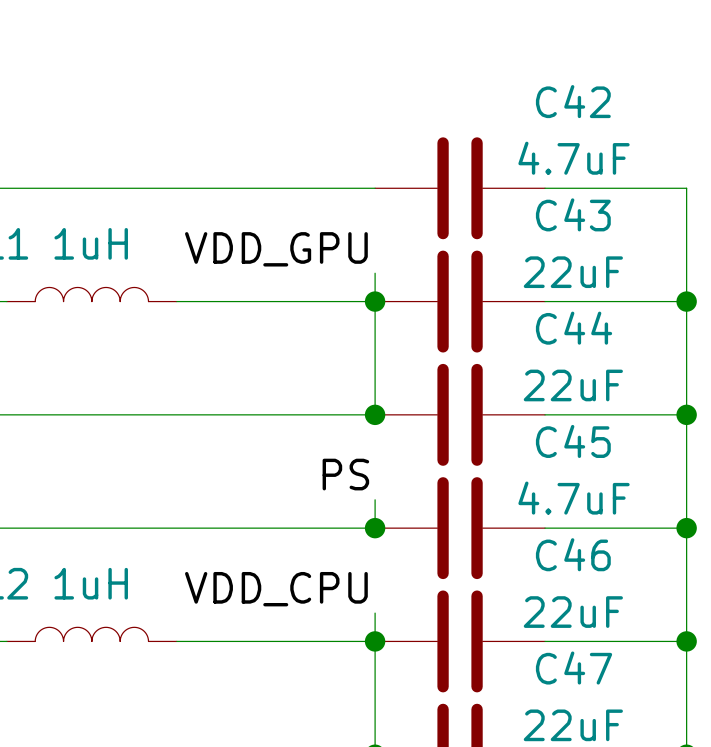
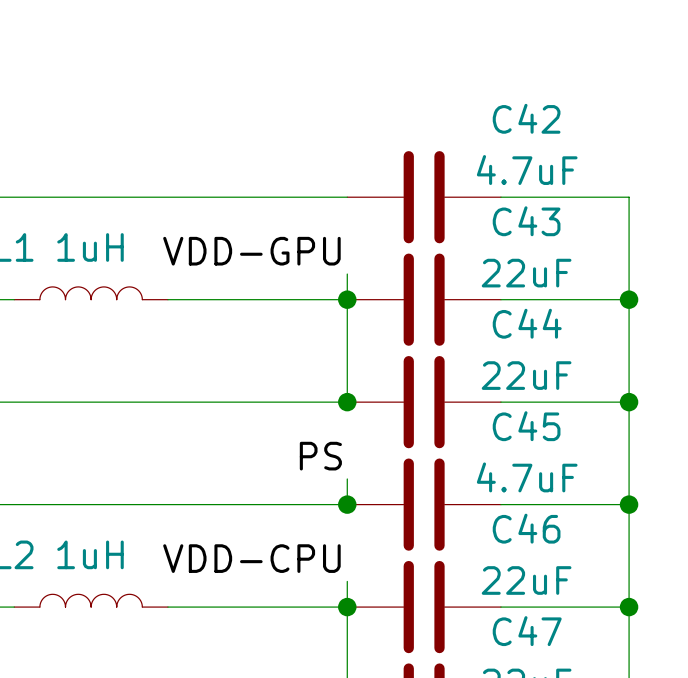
label: VDD_GPU (276, 249) -> VDD-GPU (251, 251)
label: VDD_CPU (276, 589) -> VDD-CPU (251, 558)

